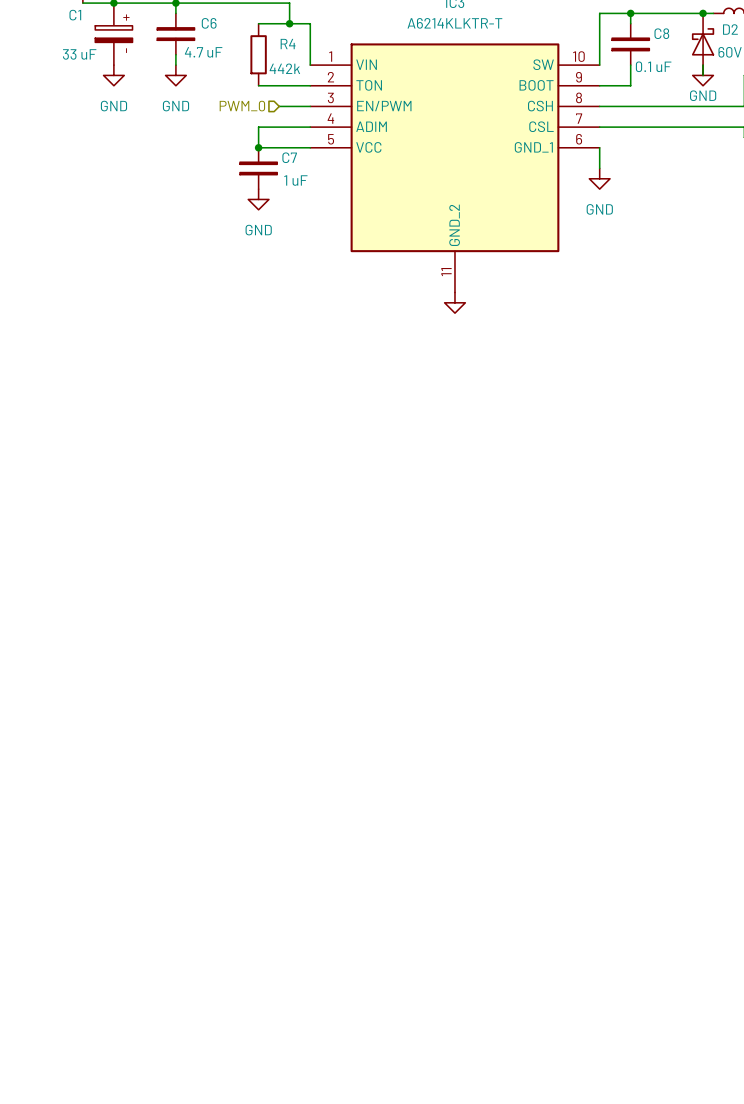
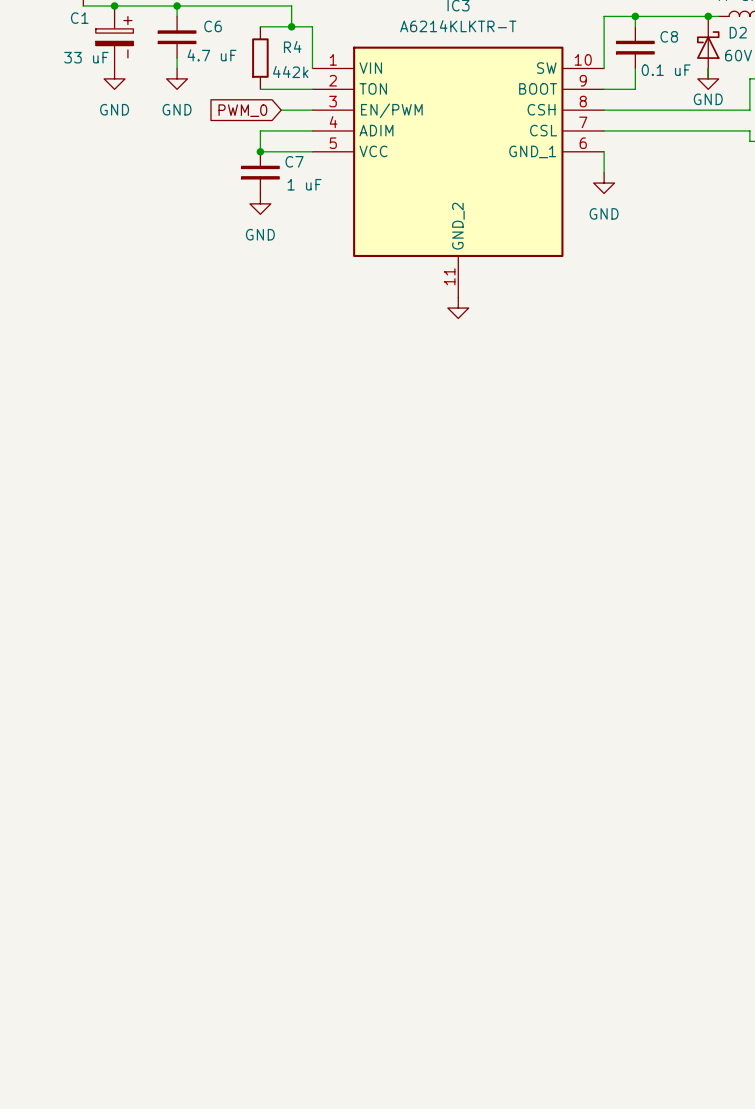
hierarchical label: PWM_0 (242, 106) -> none
global label: none -> PWM_0 (242, 110)

